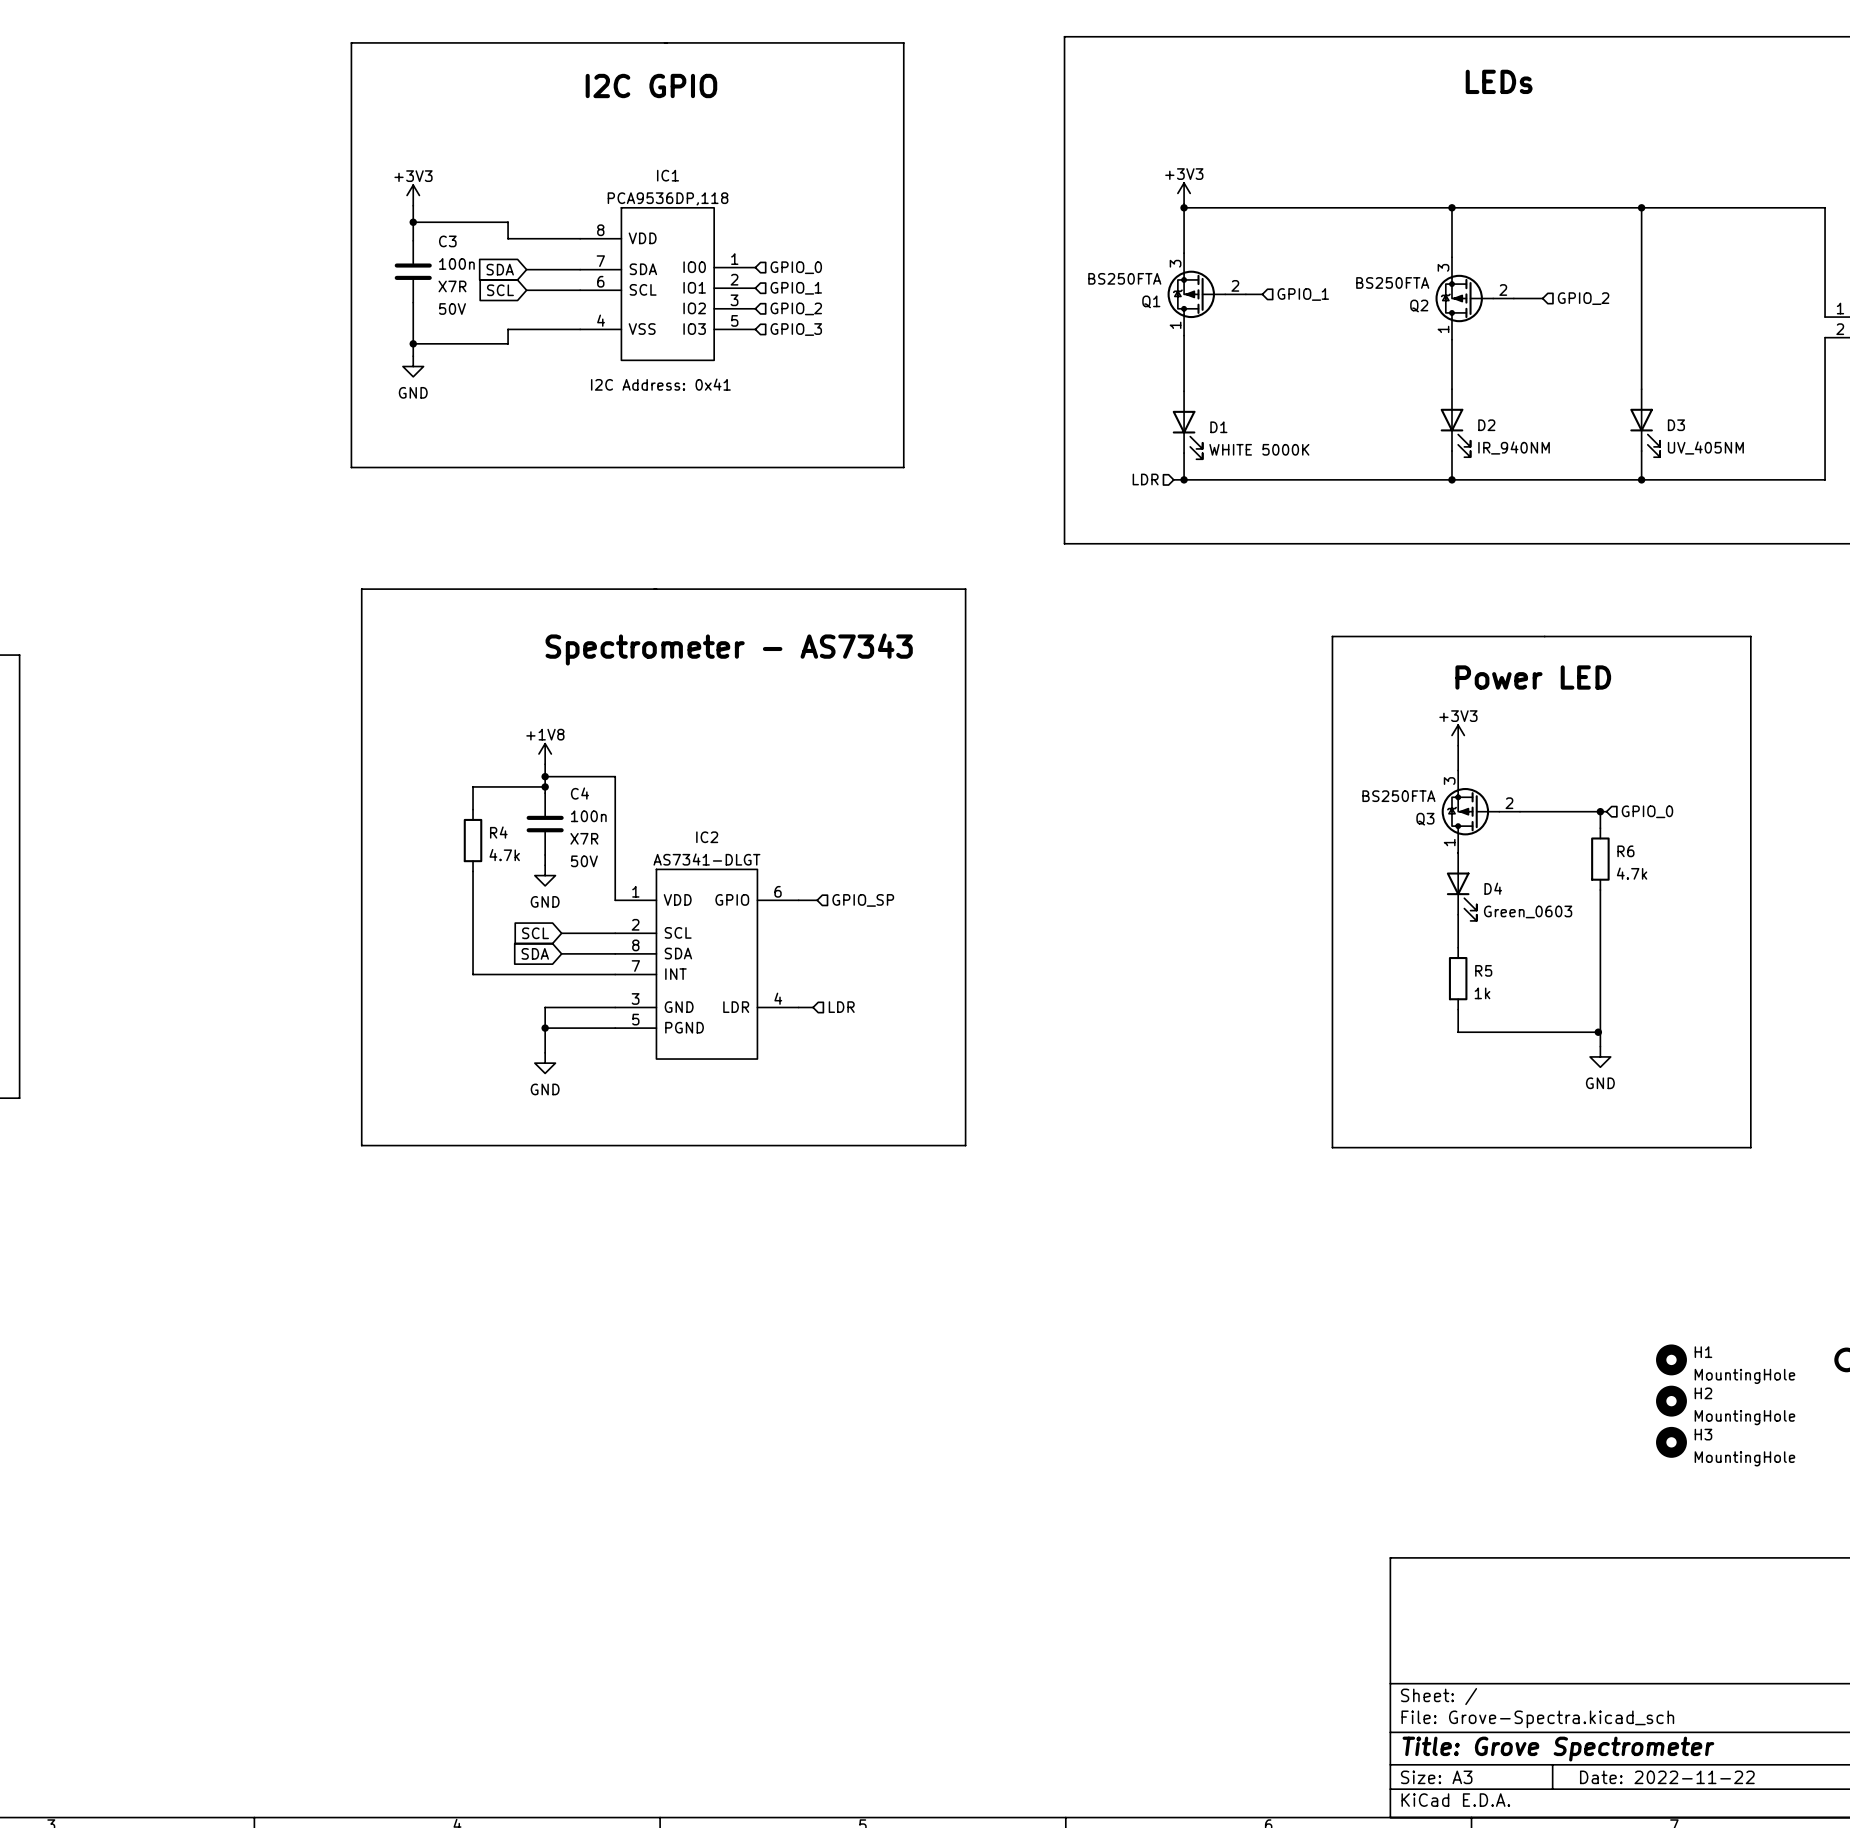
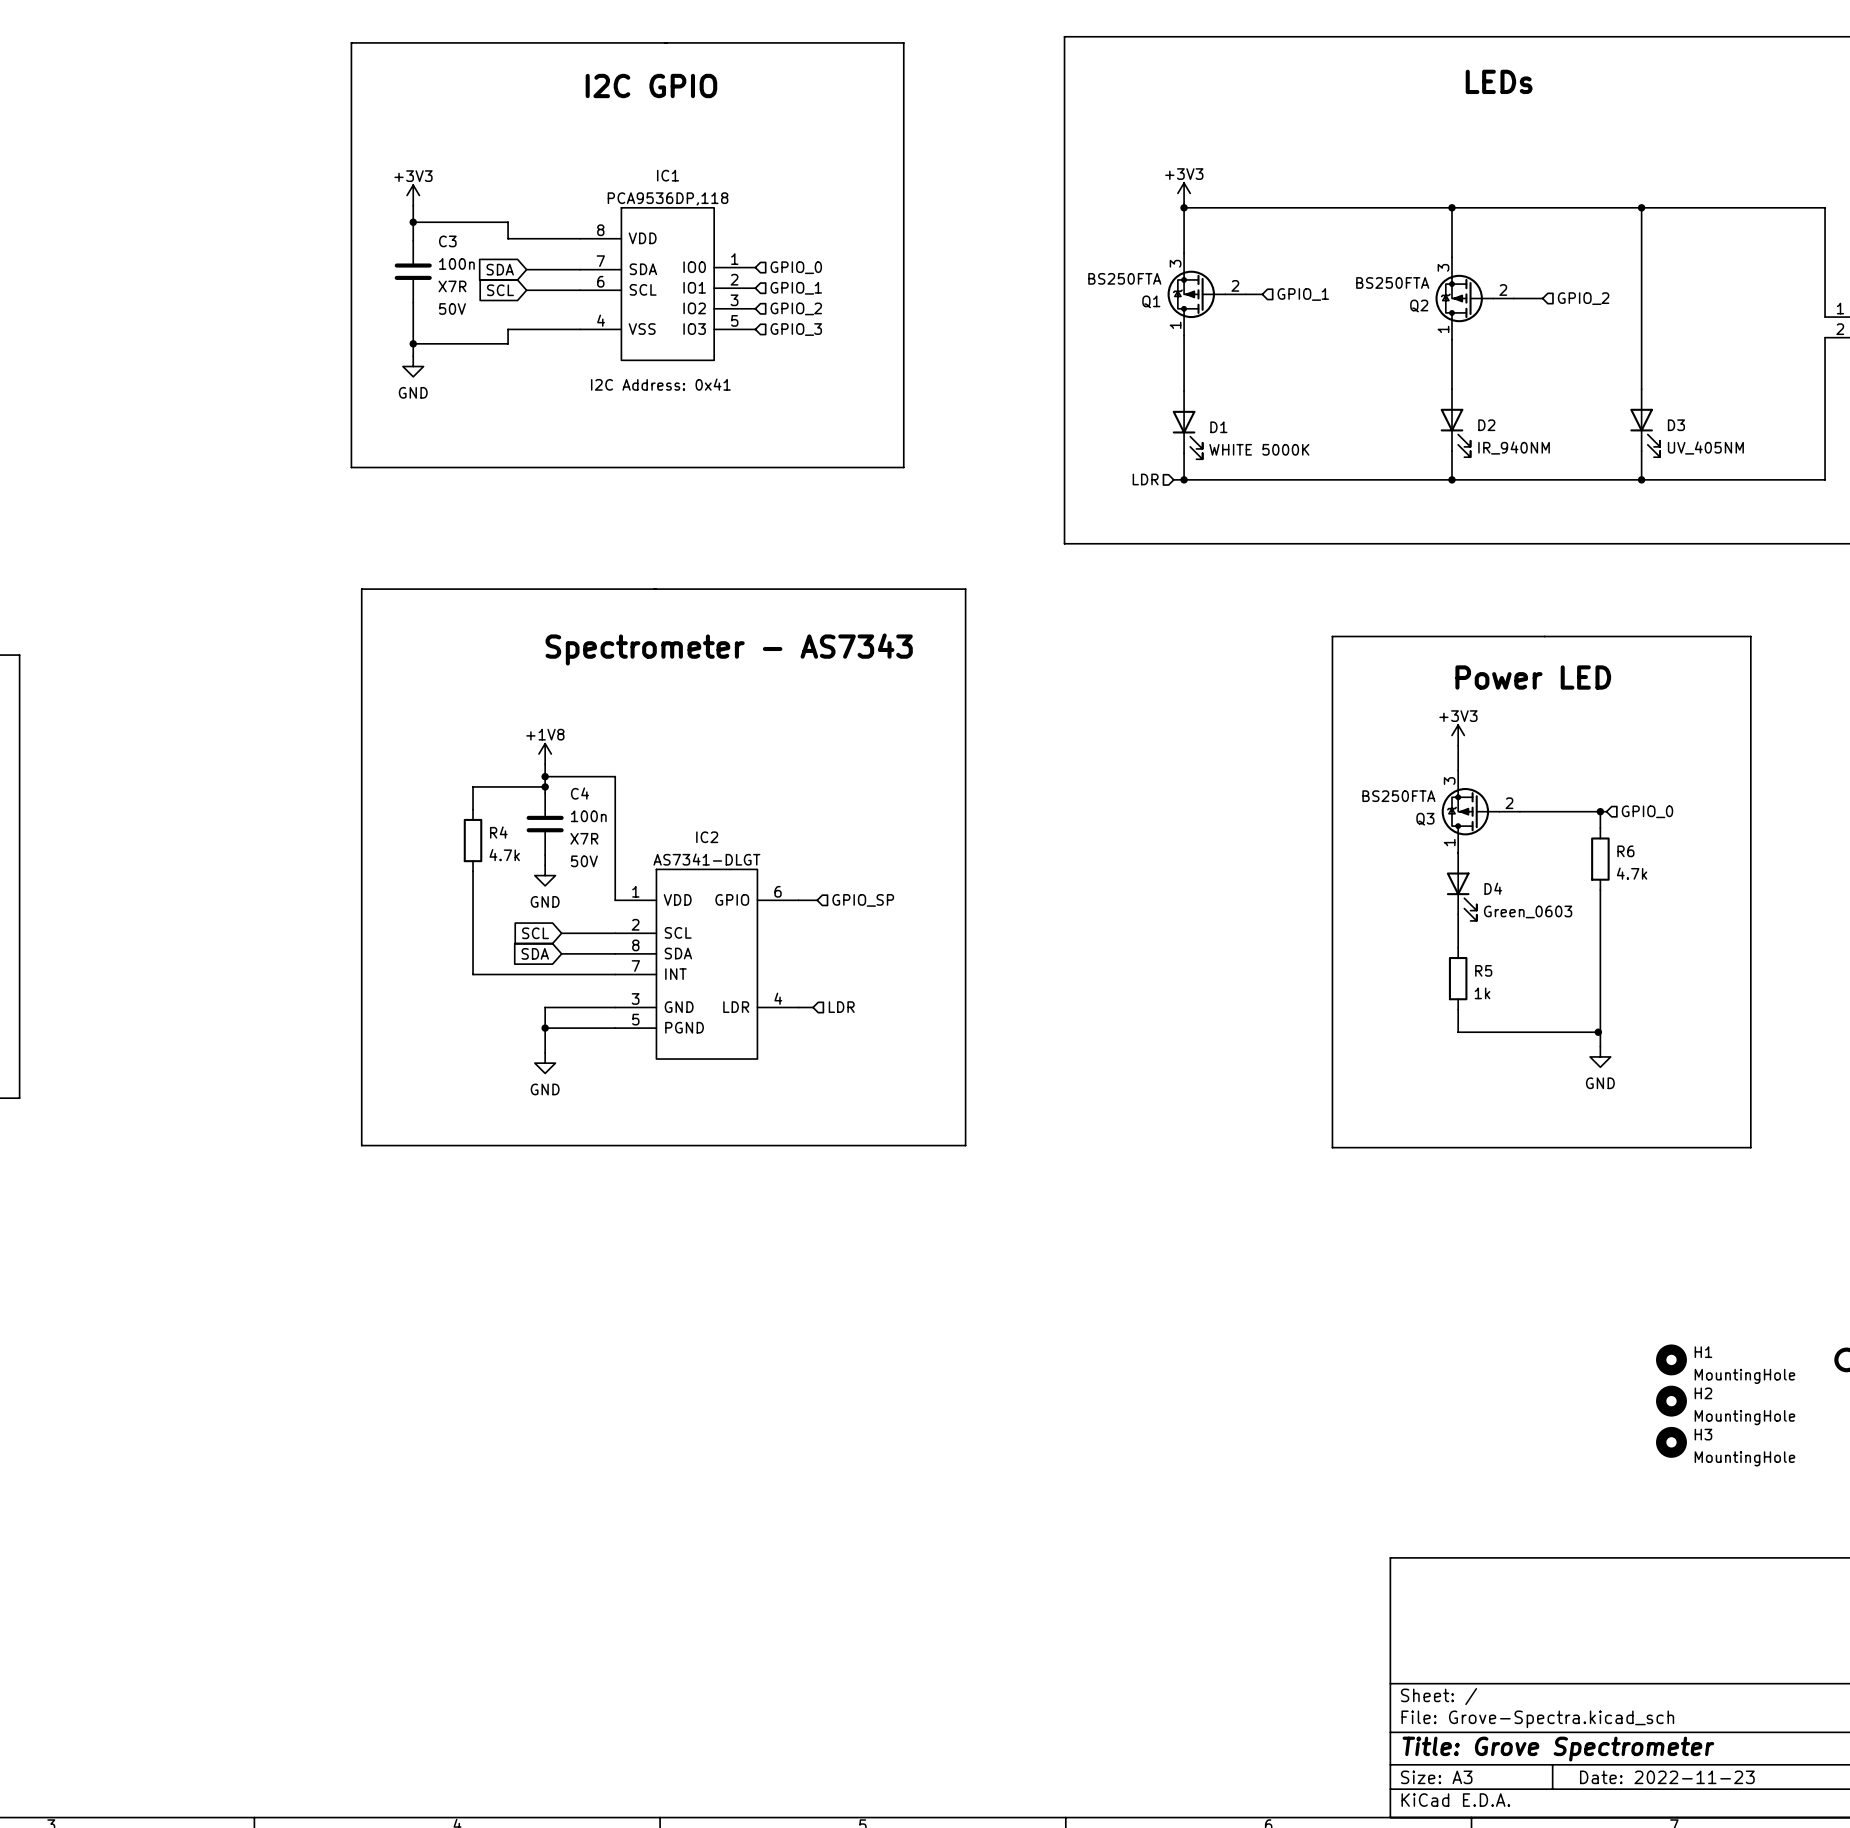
title block: Date: 2022-11-22 (1667, 1777) -> Date: 2022-11-23 (1667, 1777)

